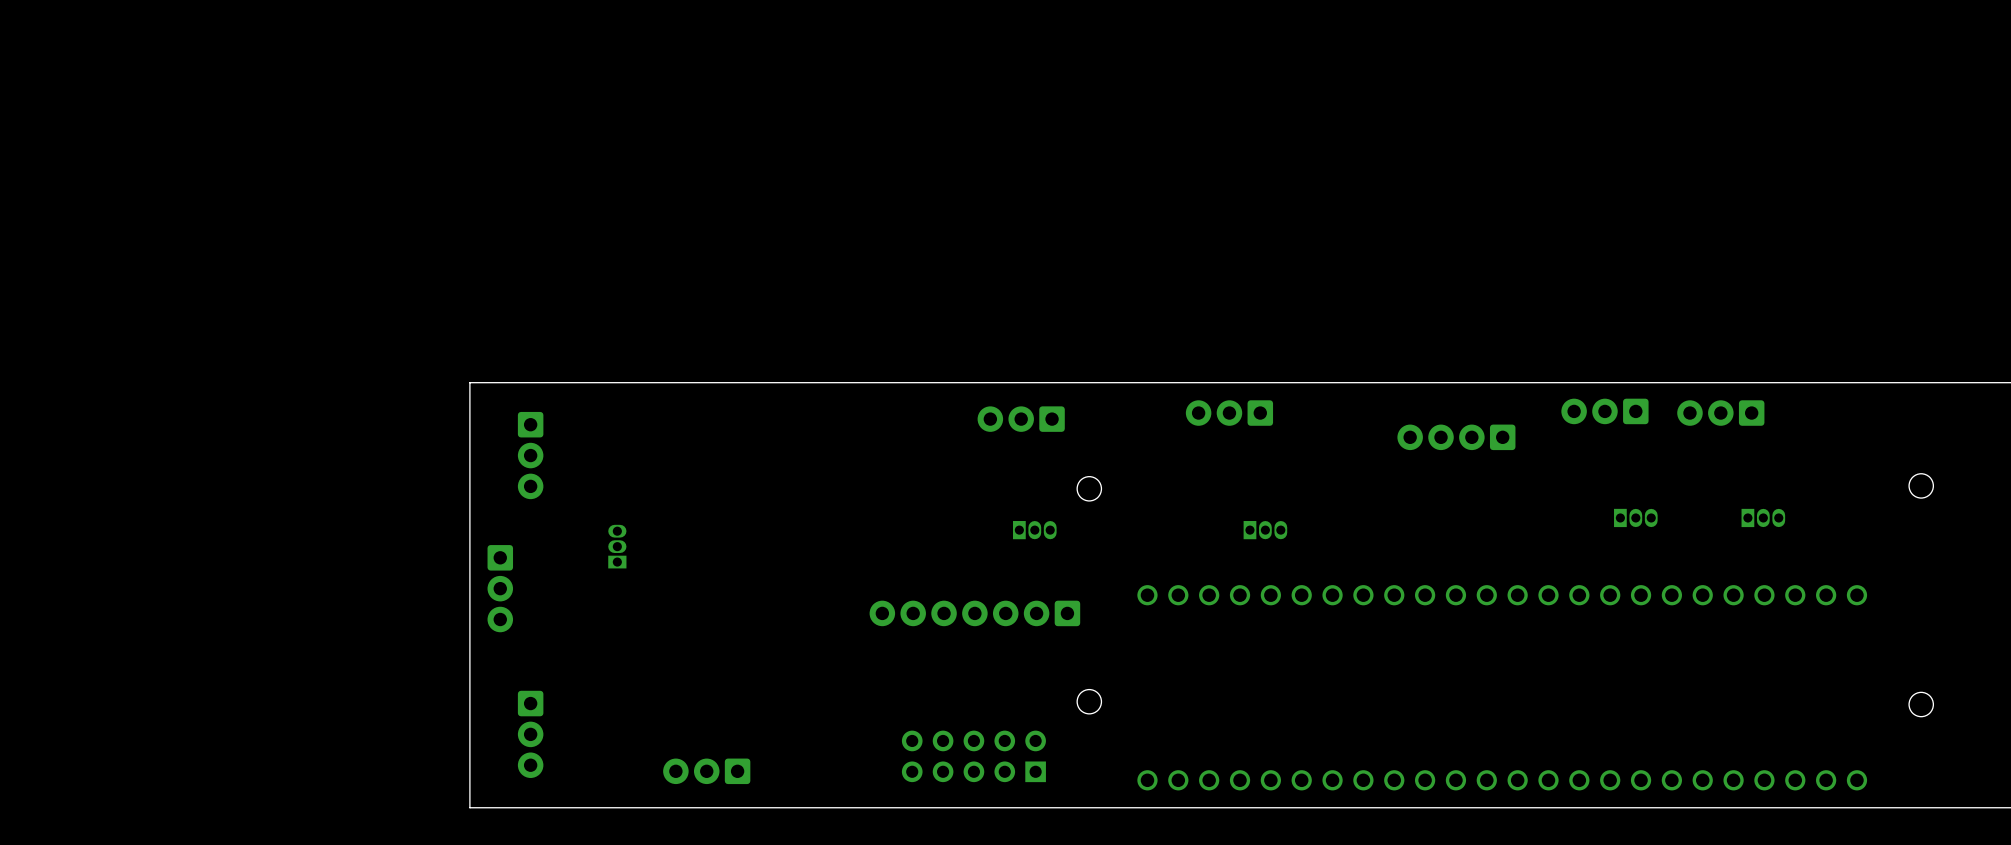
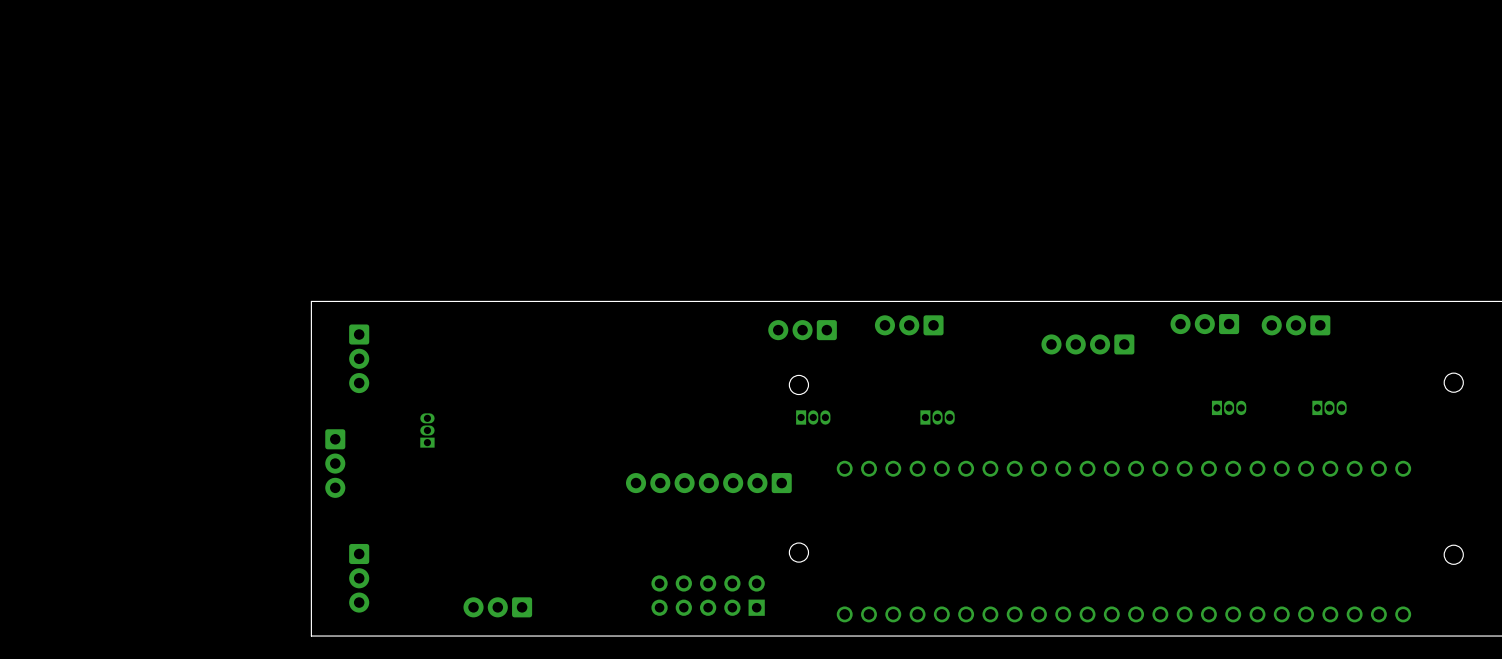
part position: (1021, 419) -> (802, 330)
part position: (1034, 530) -> (813, 417)

